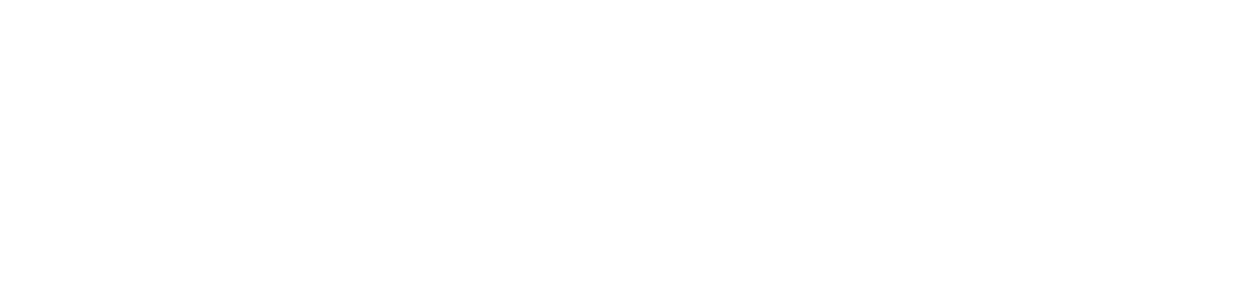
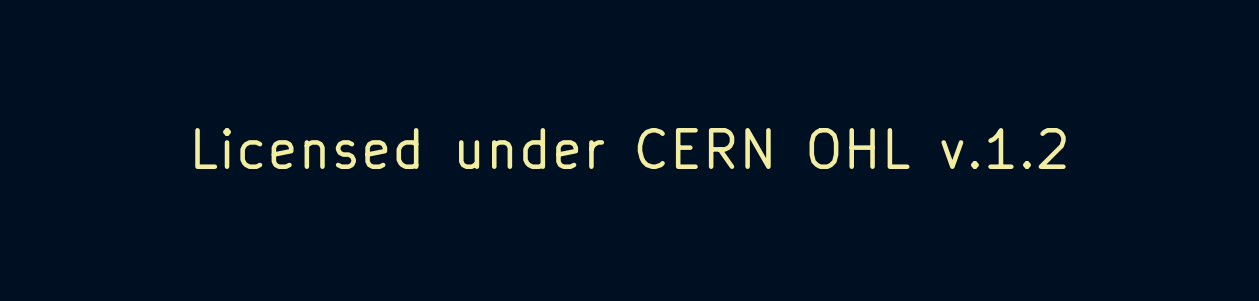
text: none -> Licensed under CERN OHL v.1.2 (630, 148)

